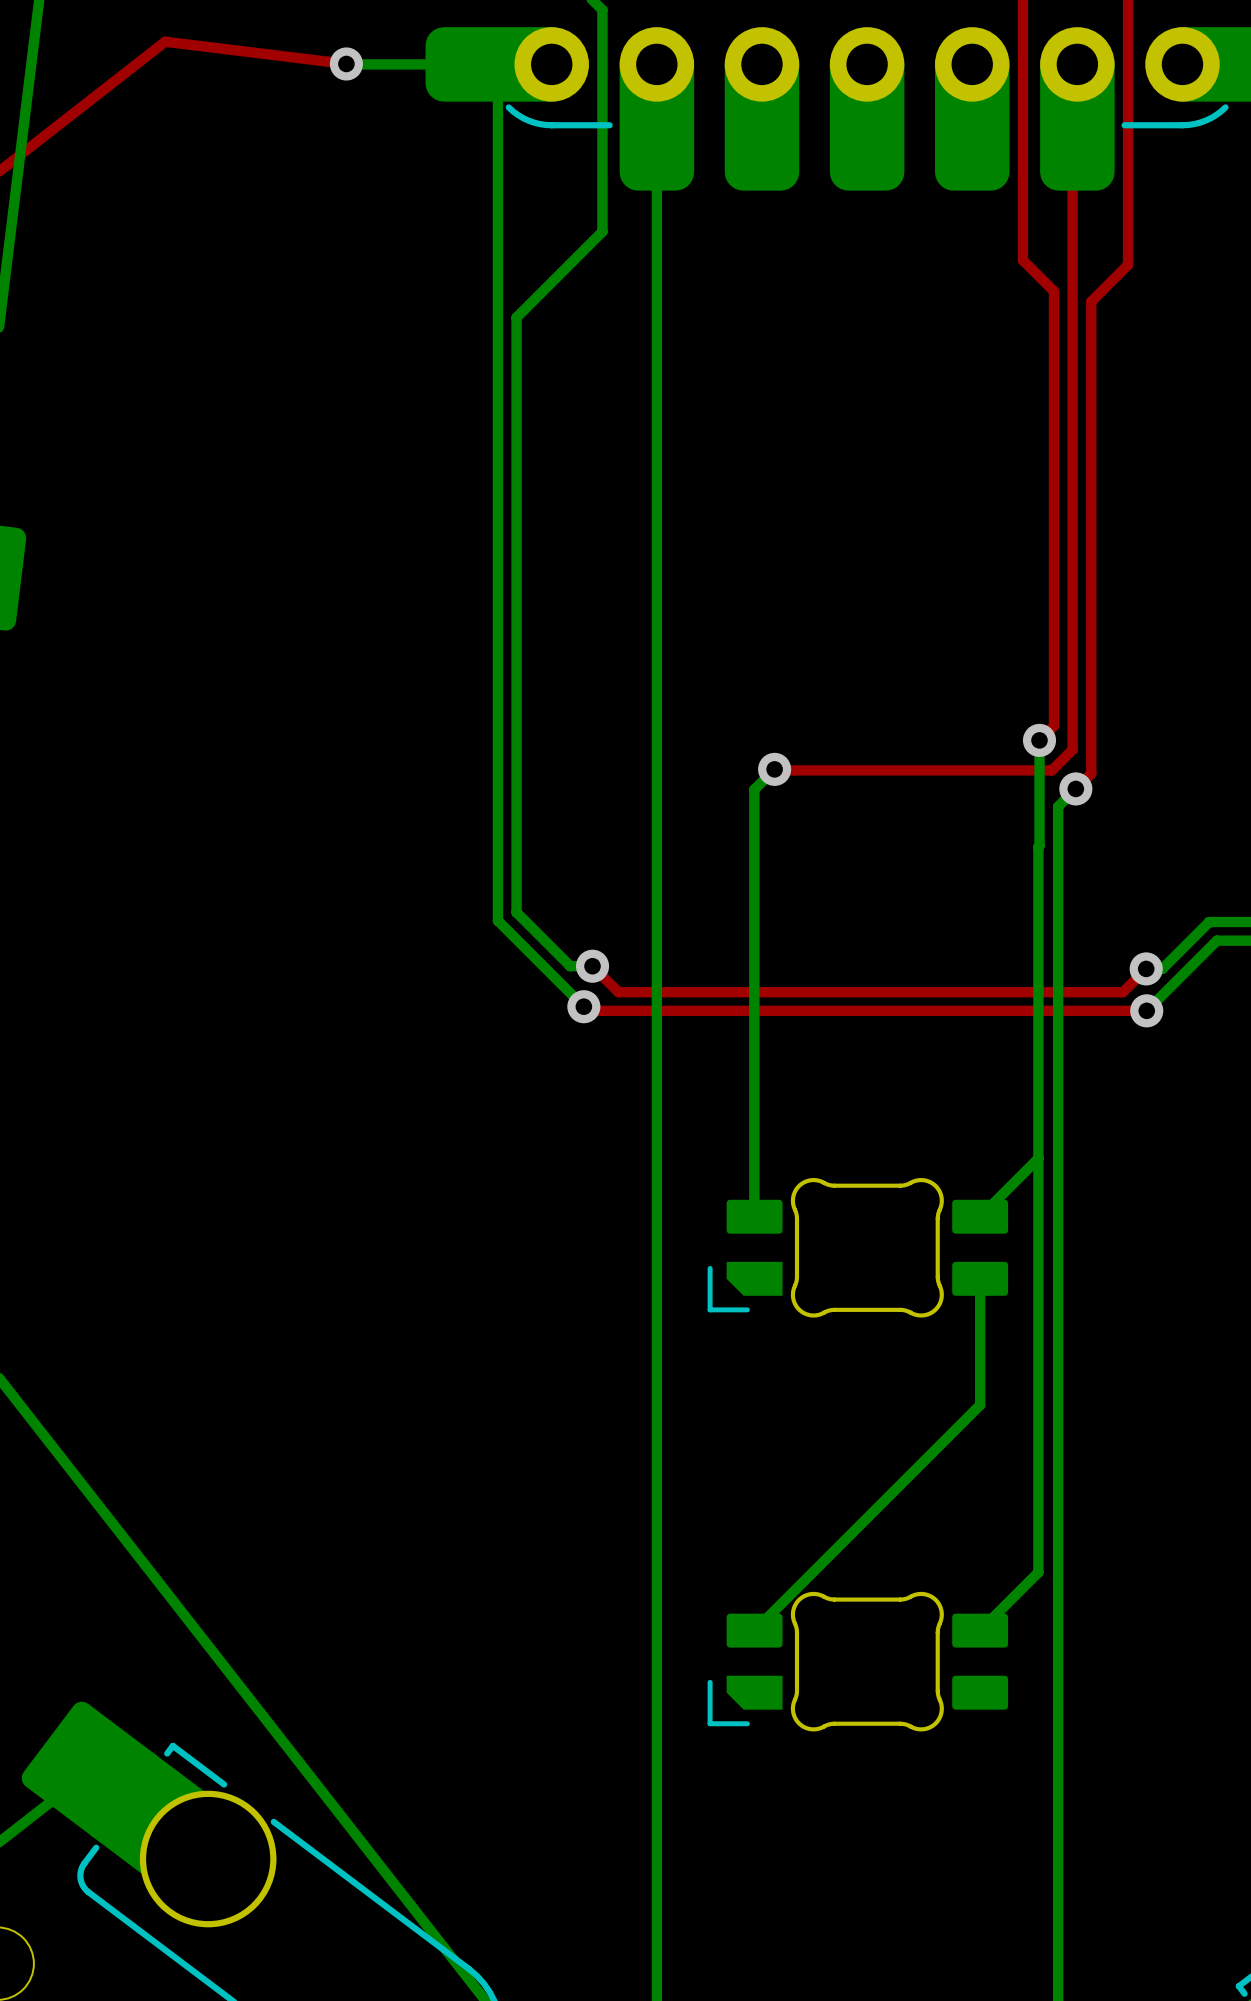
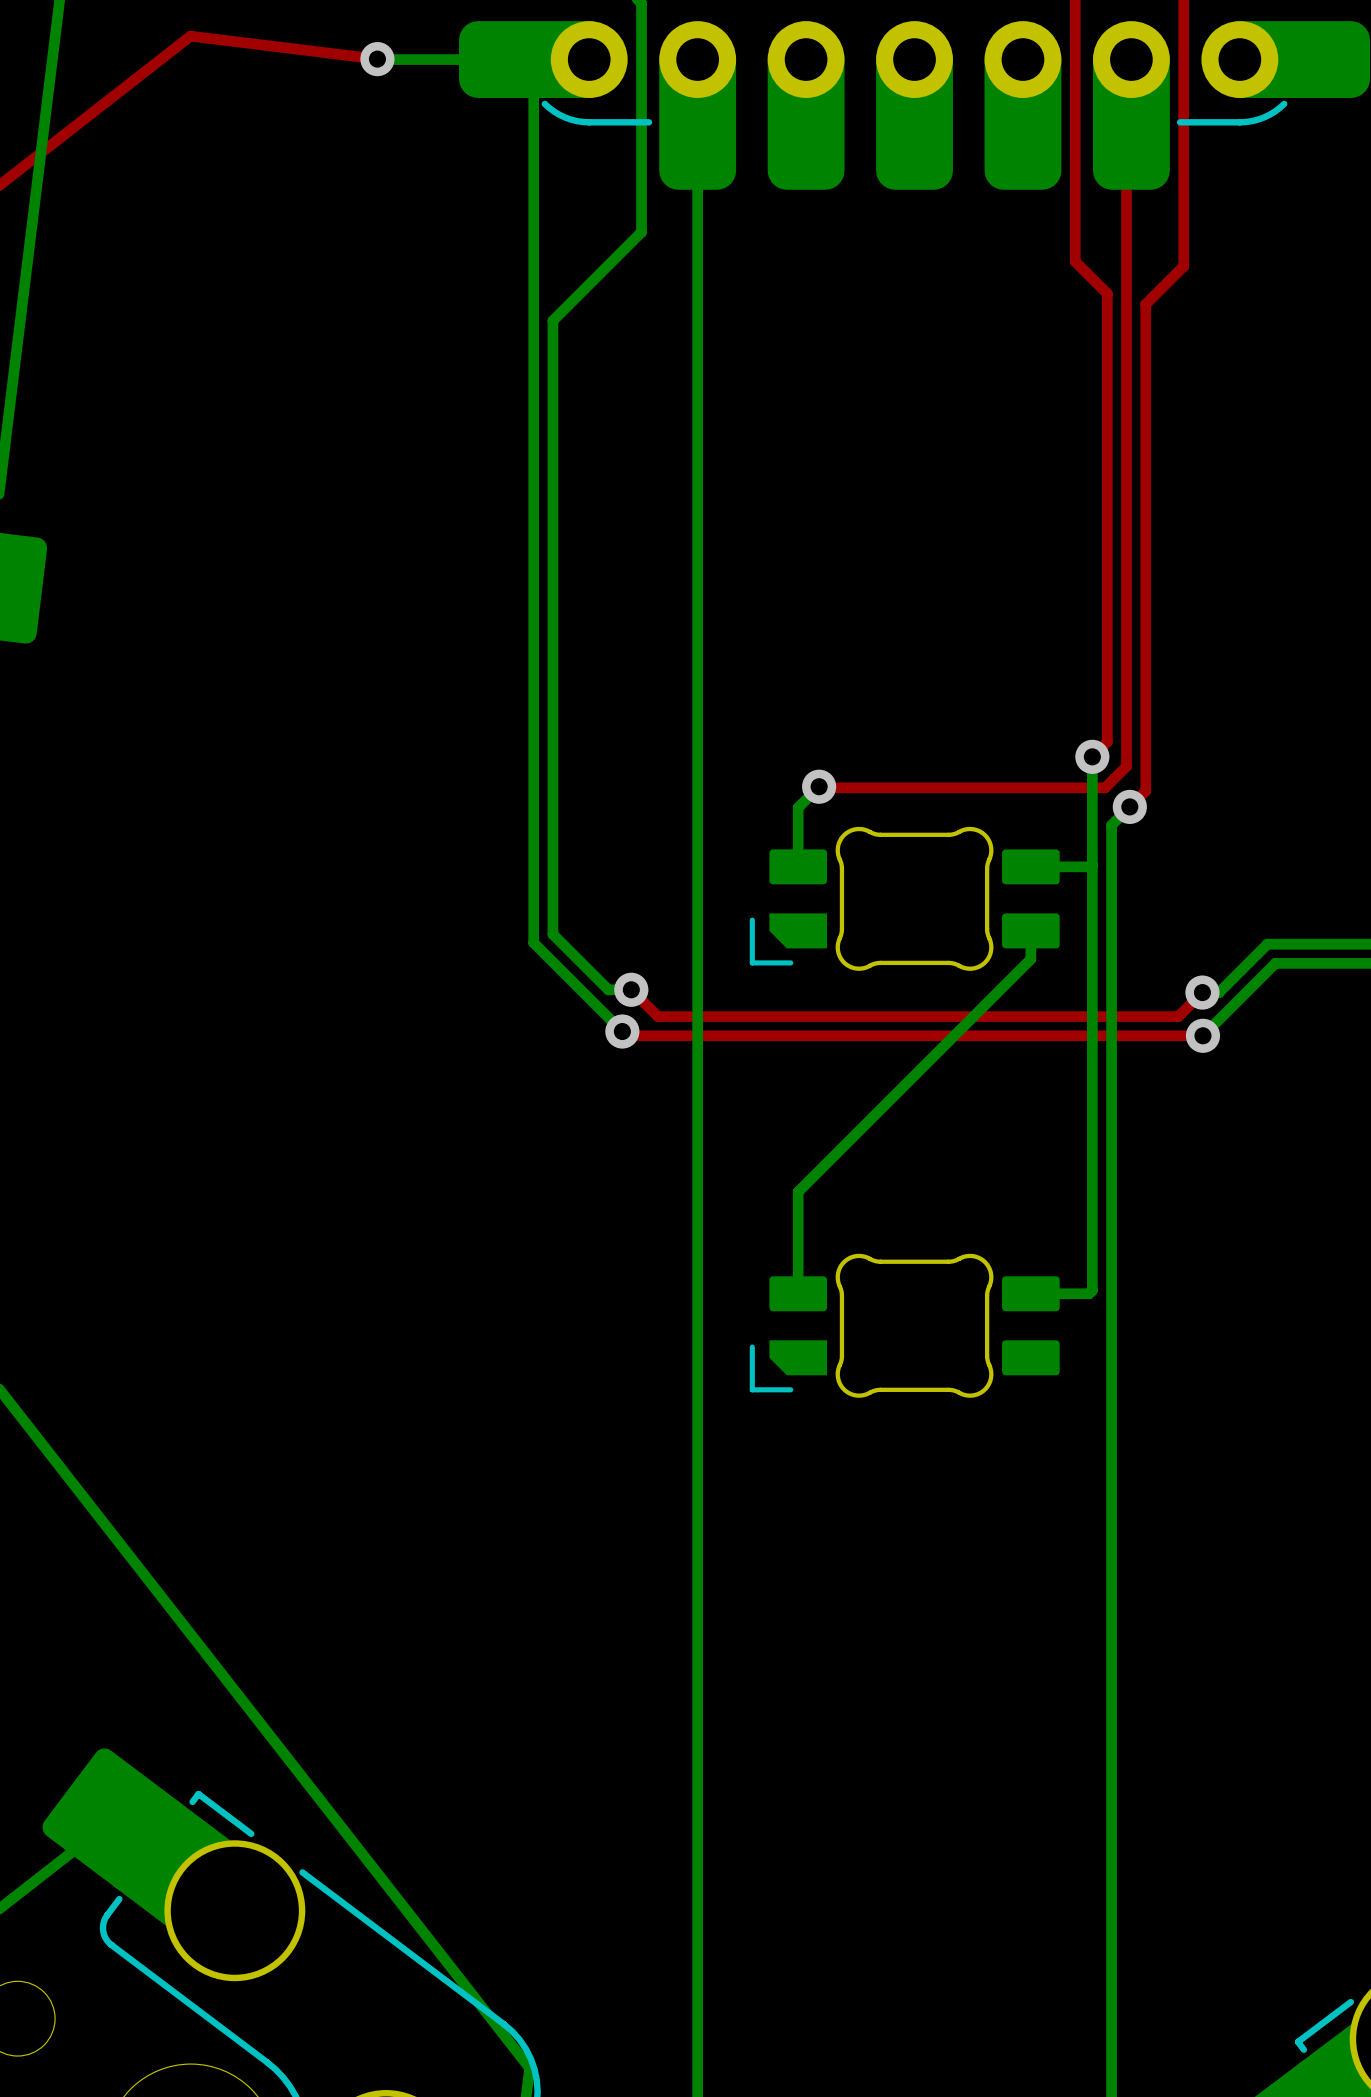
bottom track: (754, 847) (754, 1162) -> (1030, 930) (1030, 959) (798, 1191)
bottom track: (1038, 847) (1038, 1572) (980, 1630) -> (1092, 865) (1092, 1290) (1089, 1293) (1030, 1293)
bottom track: none -> (1091, 866) (1030, 866)
part: none -> (904, 898)
bottom track: (1038, 1158) (980, 1216) -> none
bottom track: none -> (798, 1247) (798, 1293)
part position: (857, 1247) -> (904, 1325)
bottom track: (980, 1278) (980, 1405) (754, 1630) -> none
part: (857, 1661) -> none

